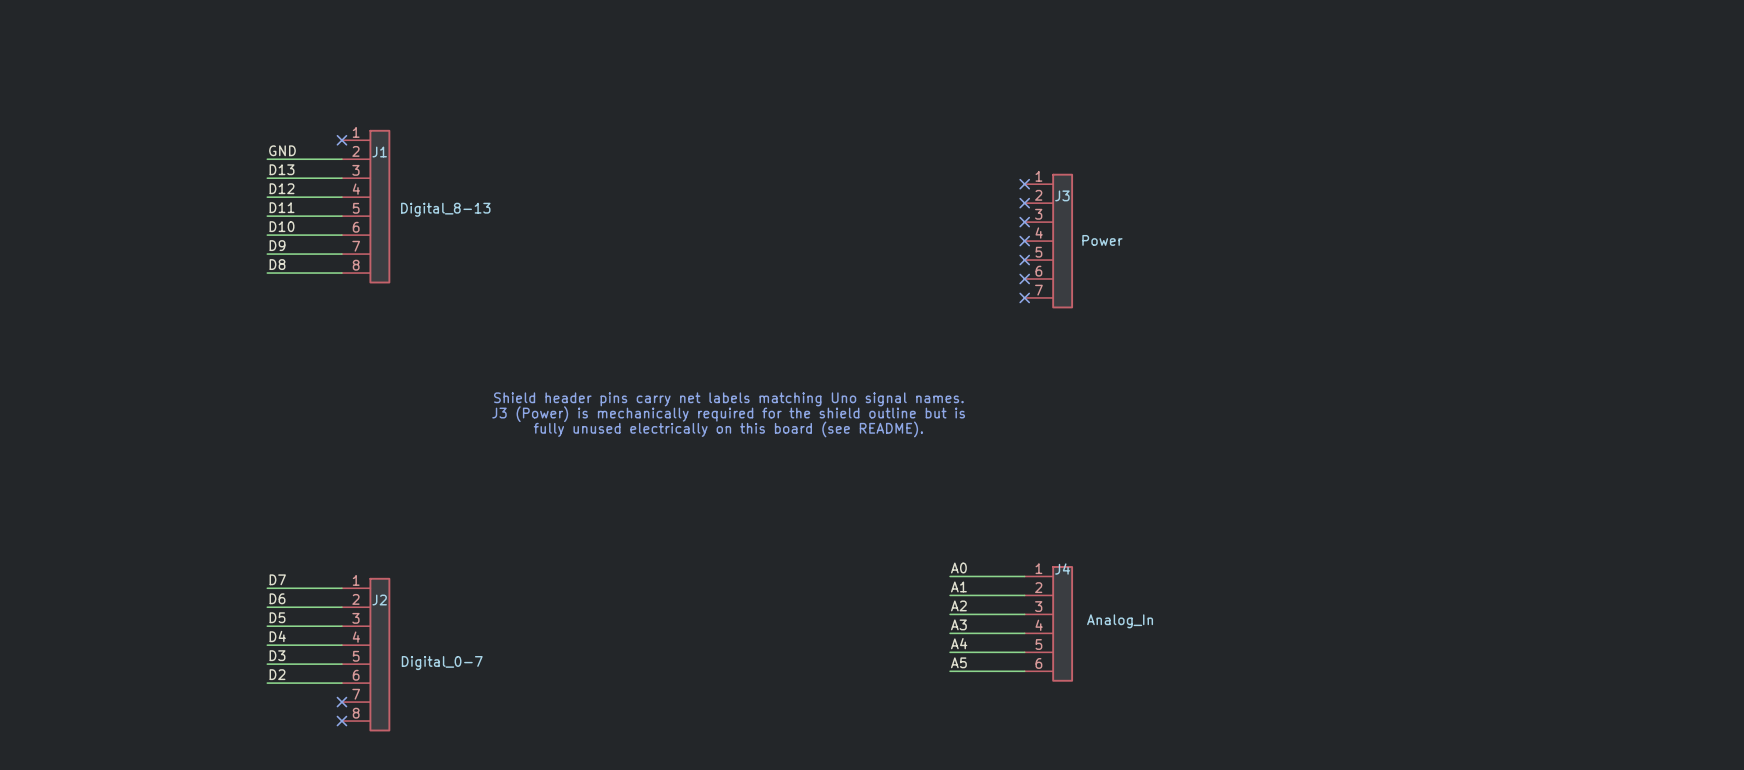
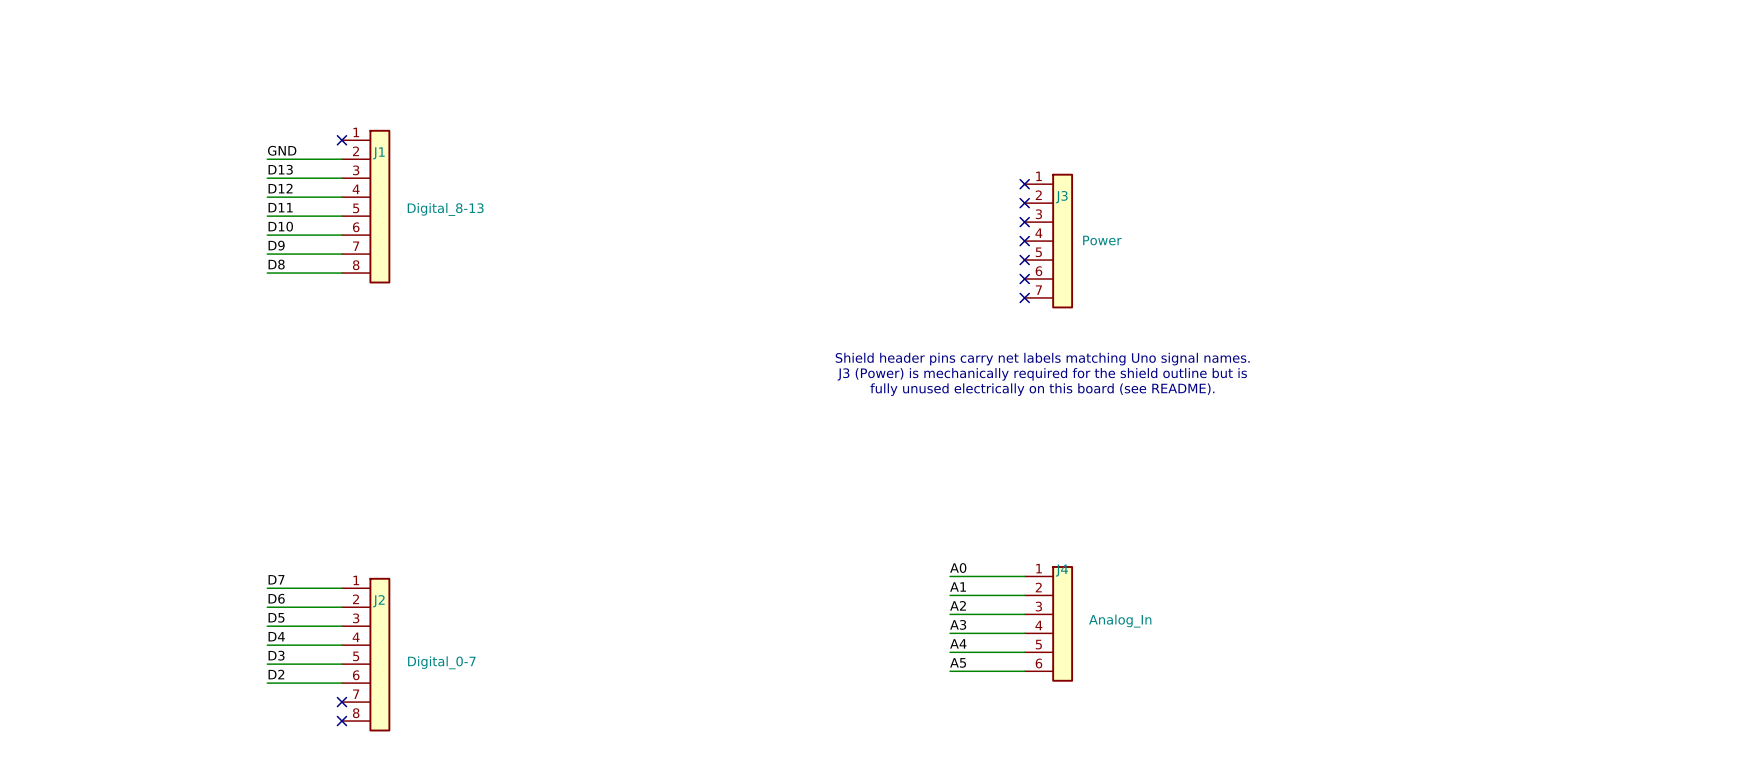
text: none -> Shield header pins carry net labels matching Uno signal names. (1042, 359)
text: none -> J3 (Power) is mechanically required for the shield outline but is (1042, 374)
text: none -> fully unused electrically on this board (see README). (1042, 389)
text: Shield header pins carry net labels matching Uno signal names. (728, 399) -> none
text: J3 (Power) is mechanically required for the shield outline but is (728, 414) -> none
text: fully unused electrically on this board (see README). (728, 429) -> none

